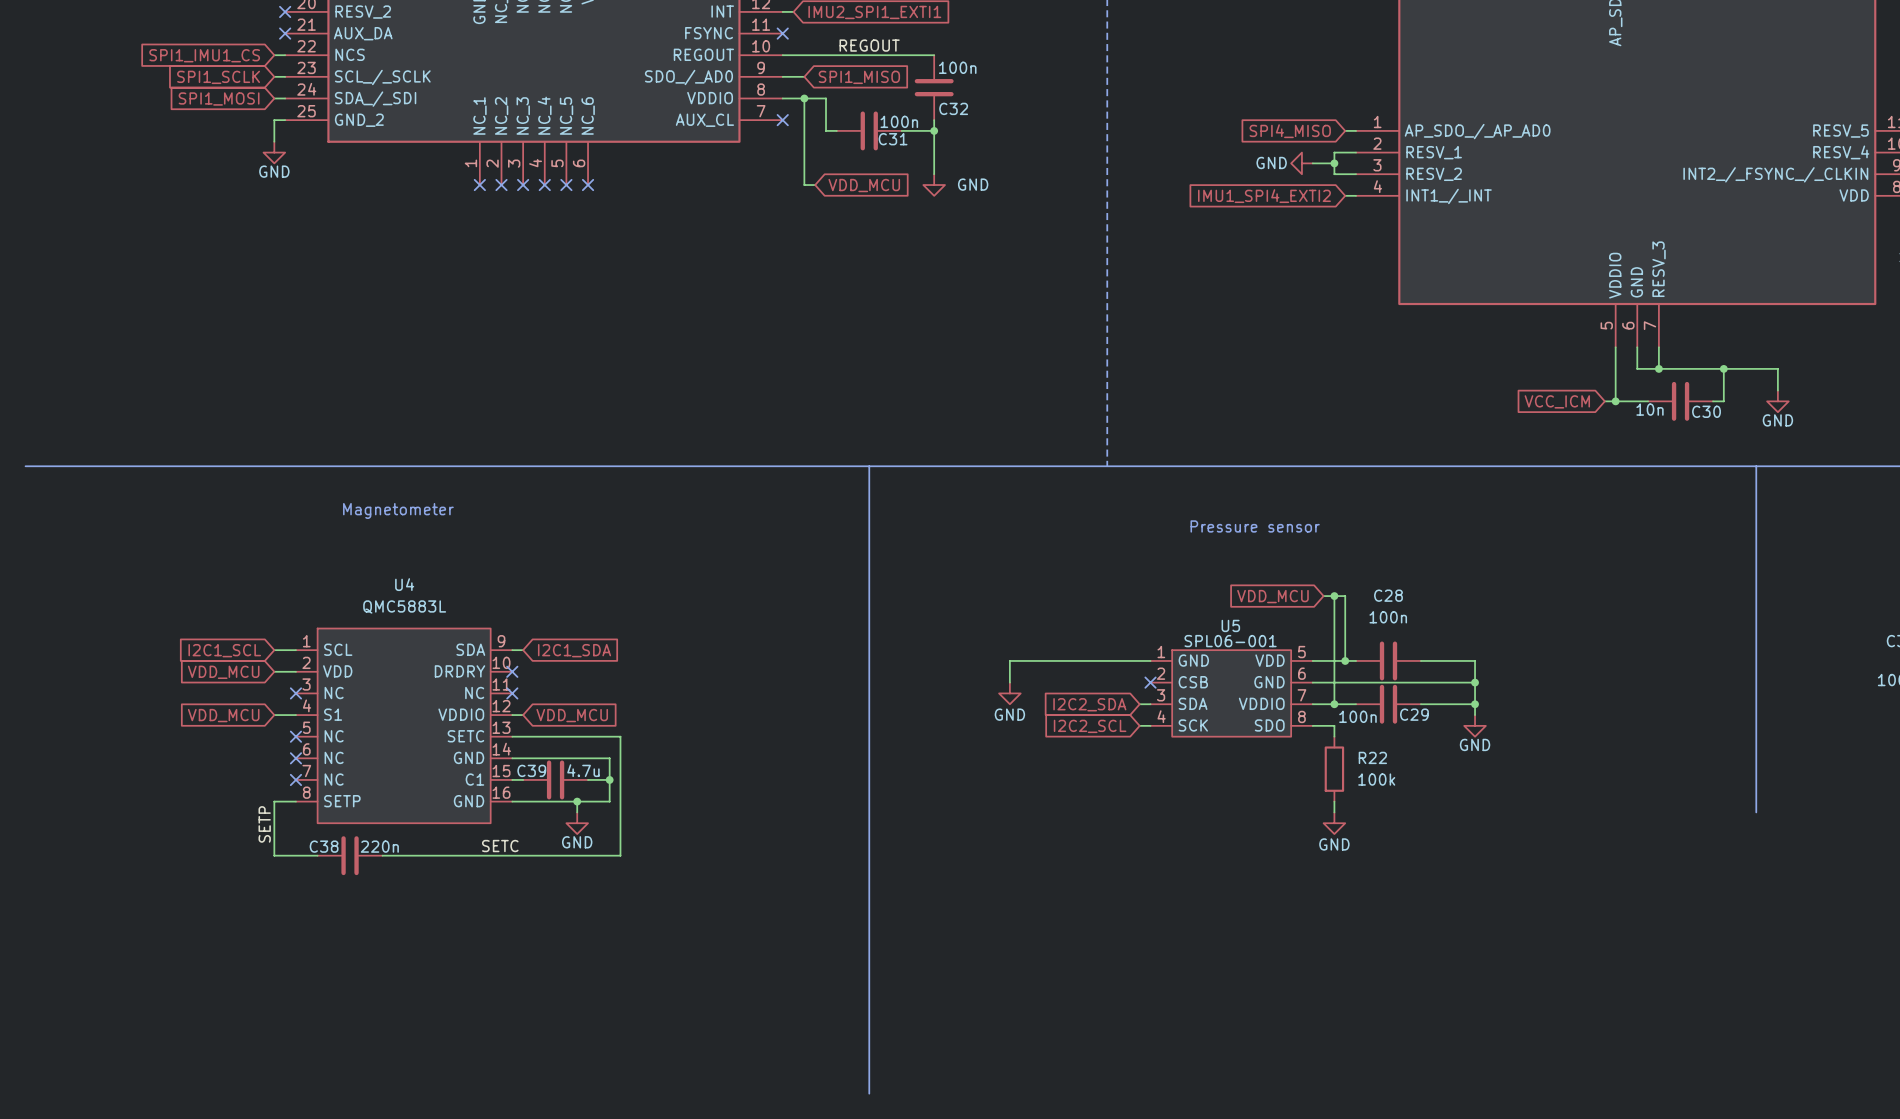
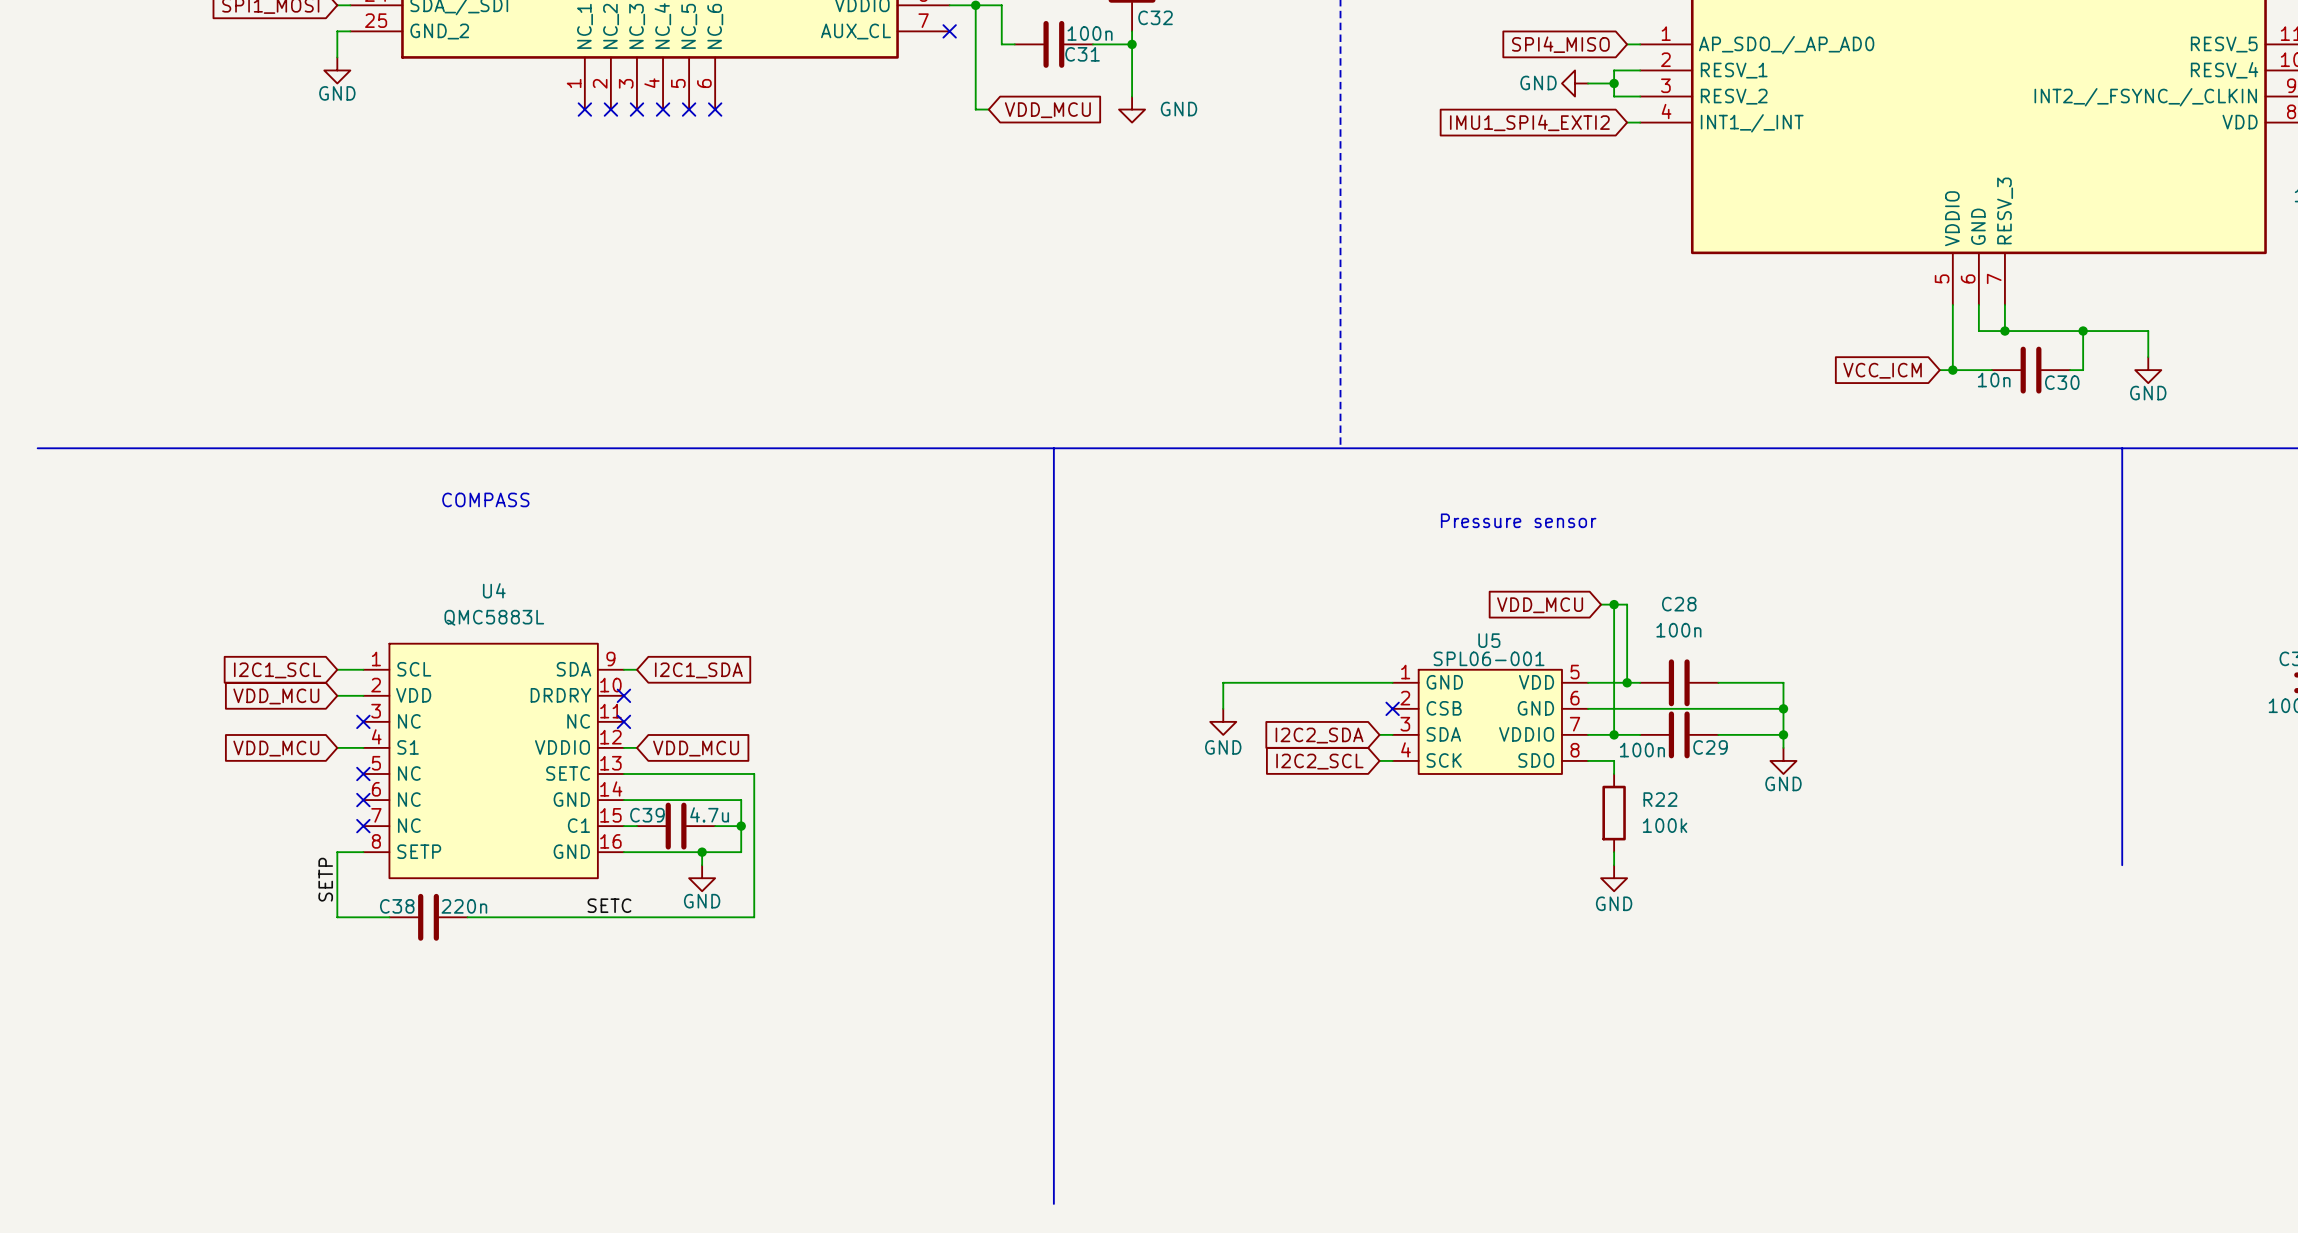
text: Magnetometer (398, 510) -> COMPASS (485, 499)

